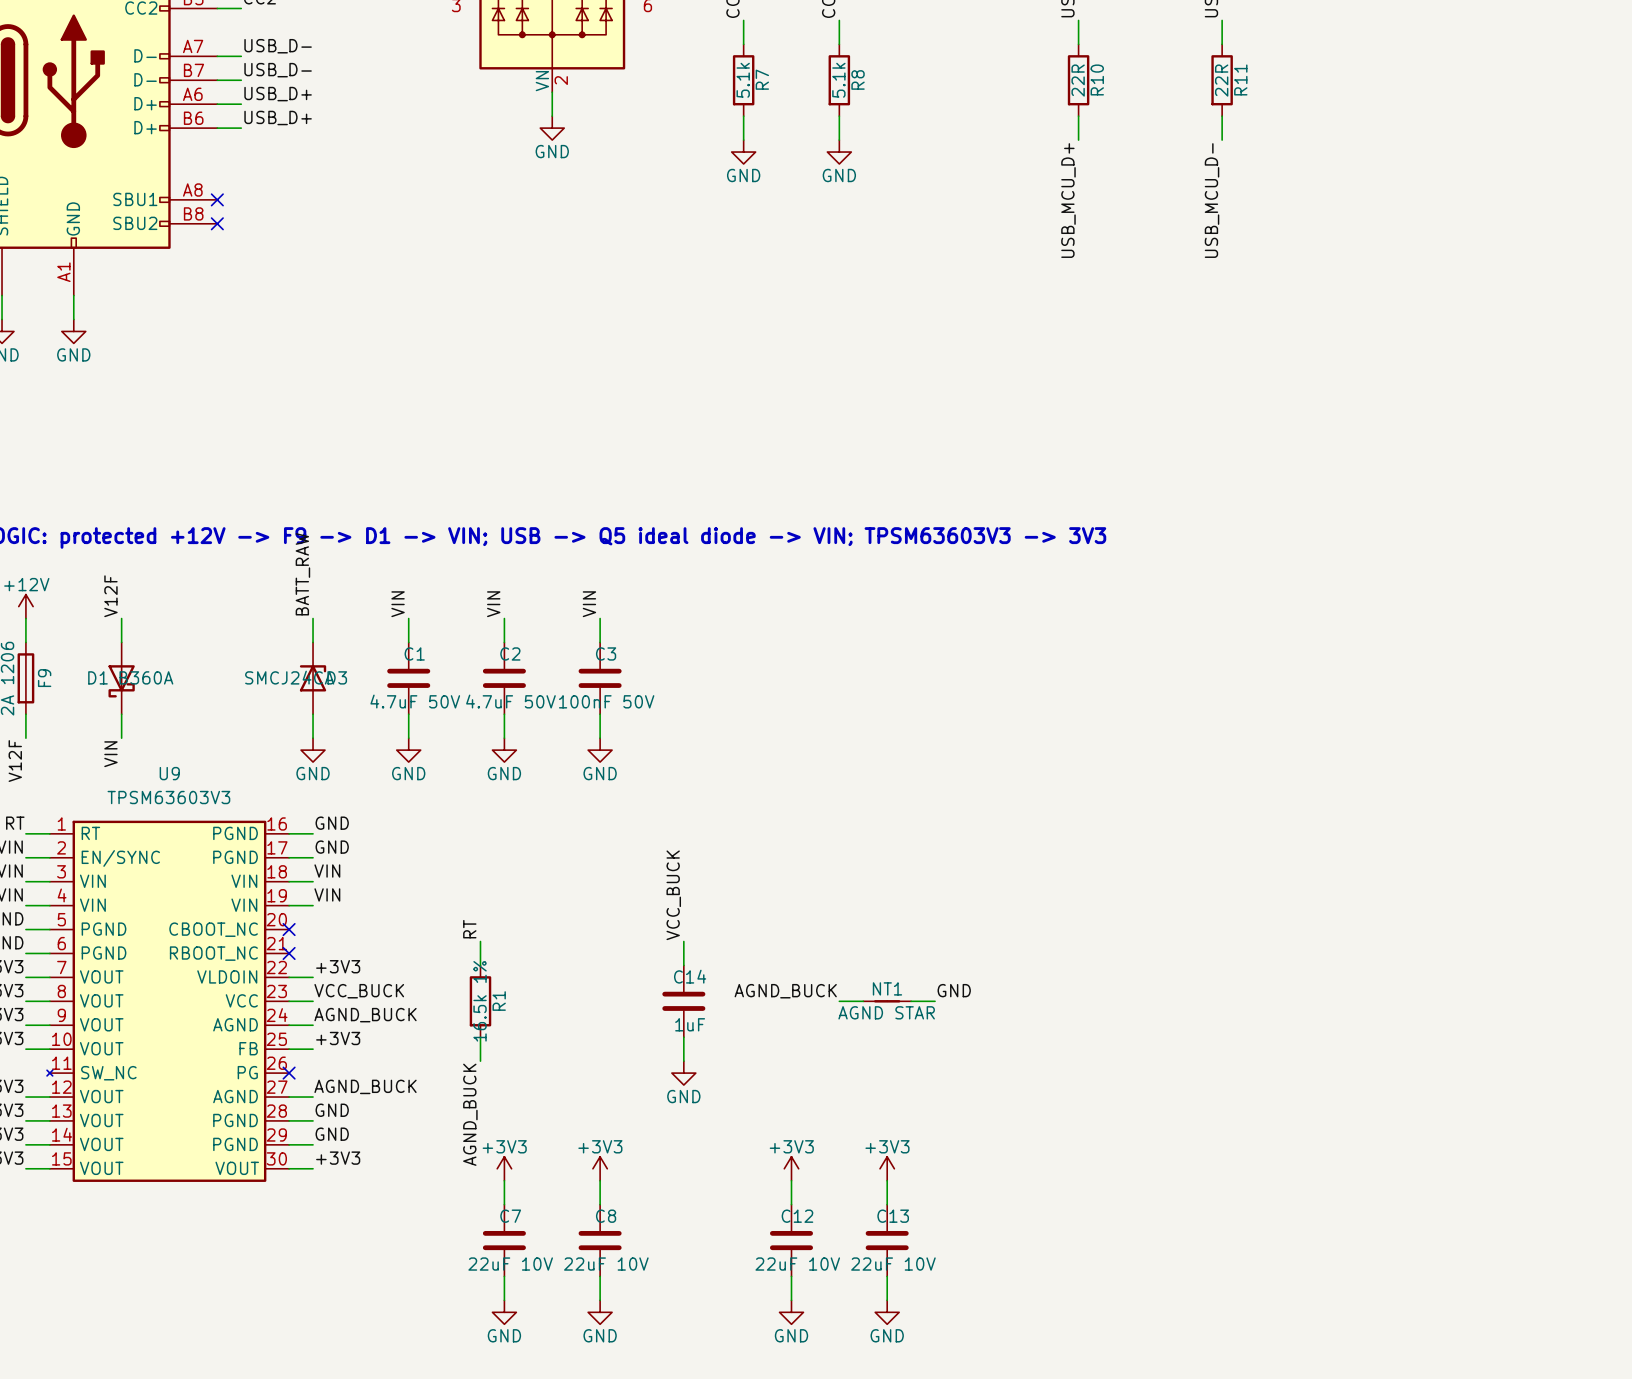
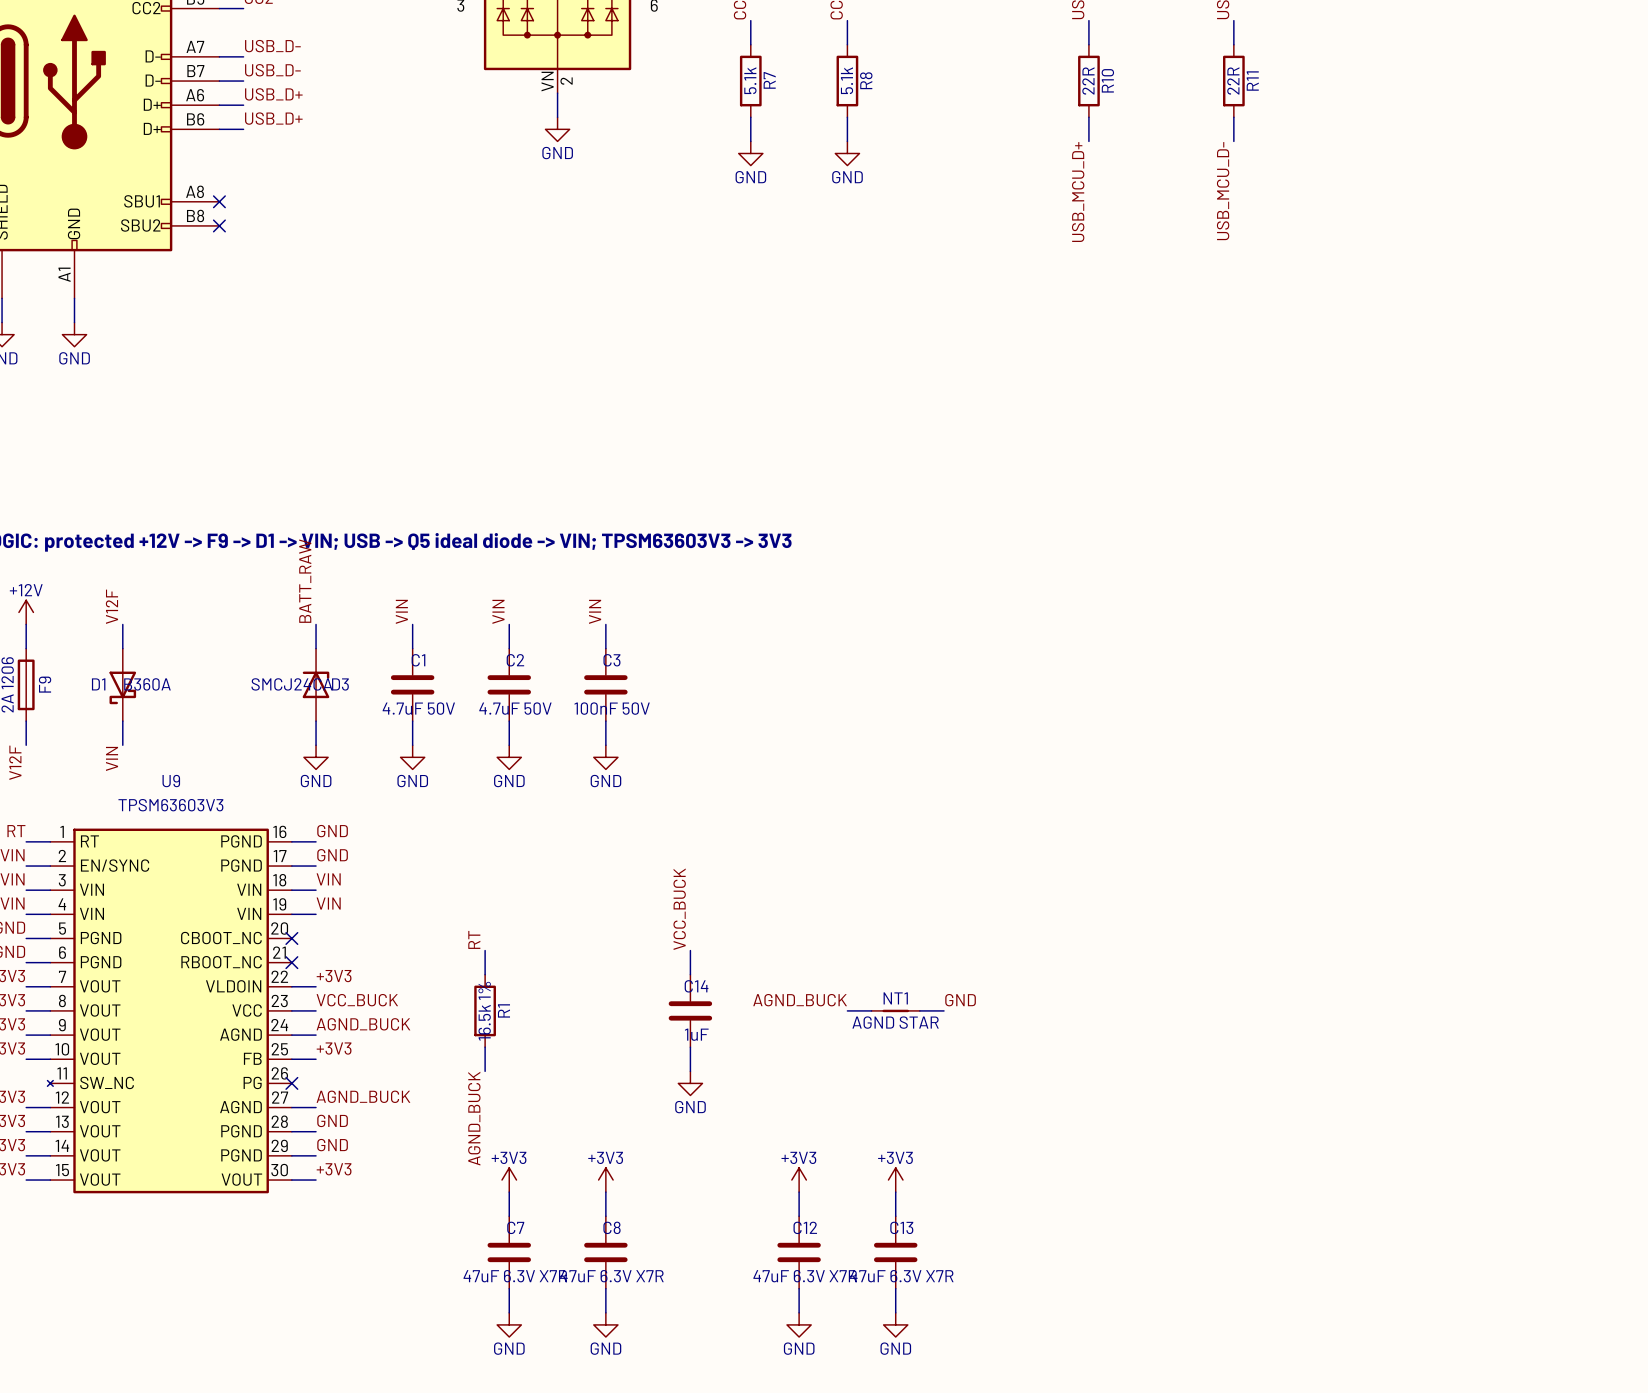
C7 value: 22uF 10V (510, 1264) -> 47uF 6.3V X7R (515, 1276)
C8 value: 22uF 10V (606, 1264) -> 47uF 6.3V X7R (611, 1276)
C12 value: 22uF 10V (797, 1264) -> 47uF 6.3V X7R (805, 1276)
C13 value: 22uF 10V (893, 1264) -> 47uF 6.3V X7R (901, 1276)

